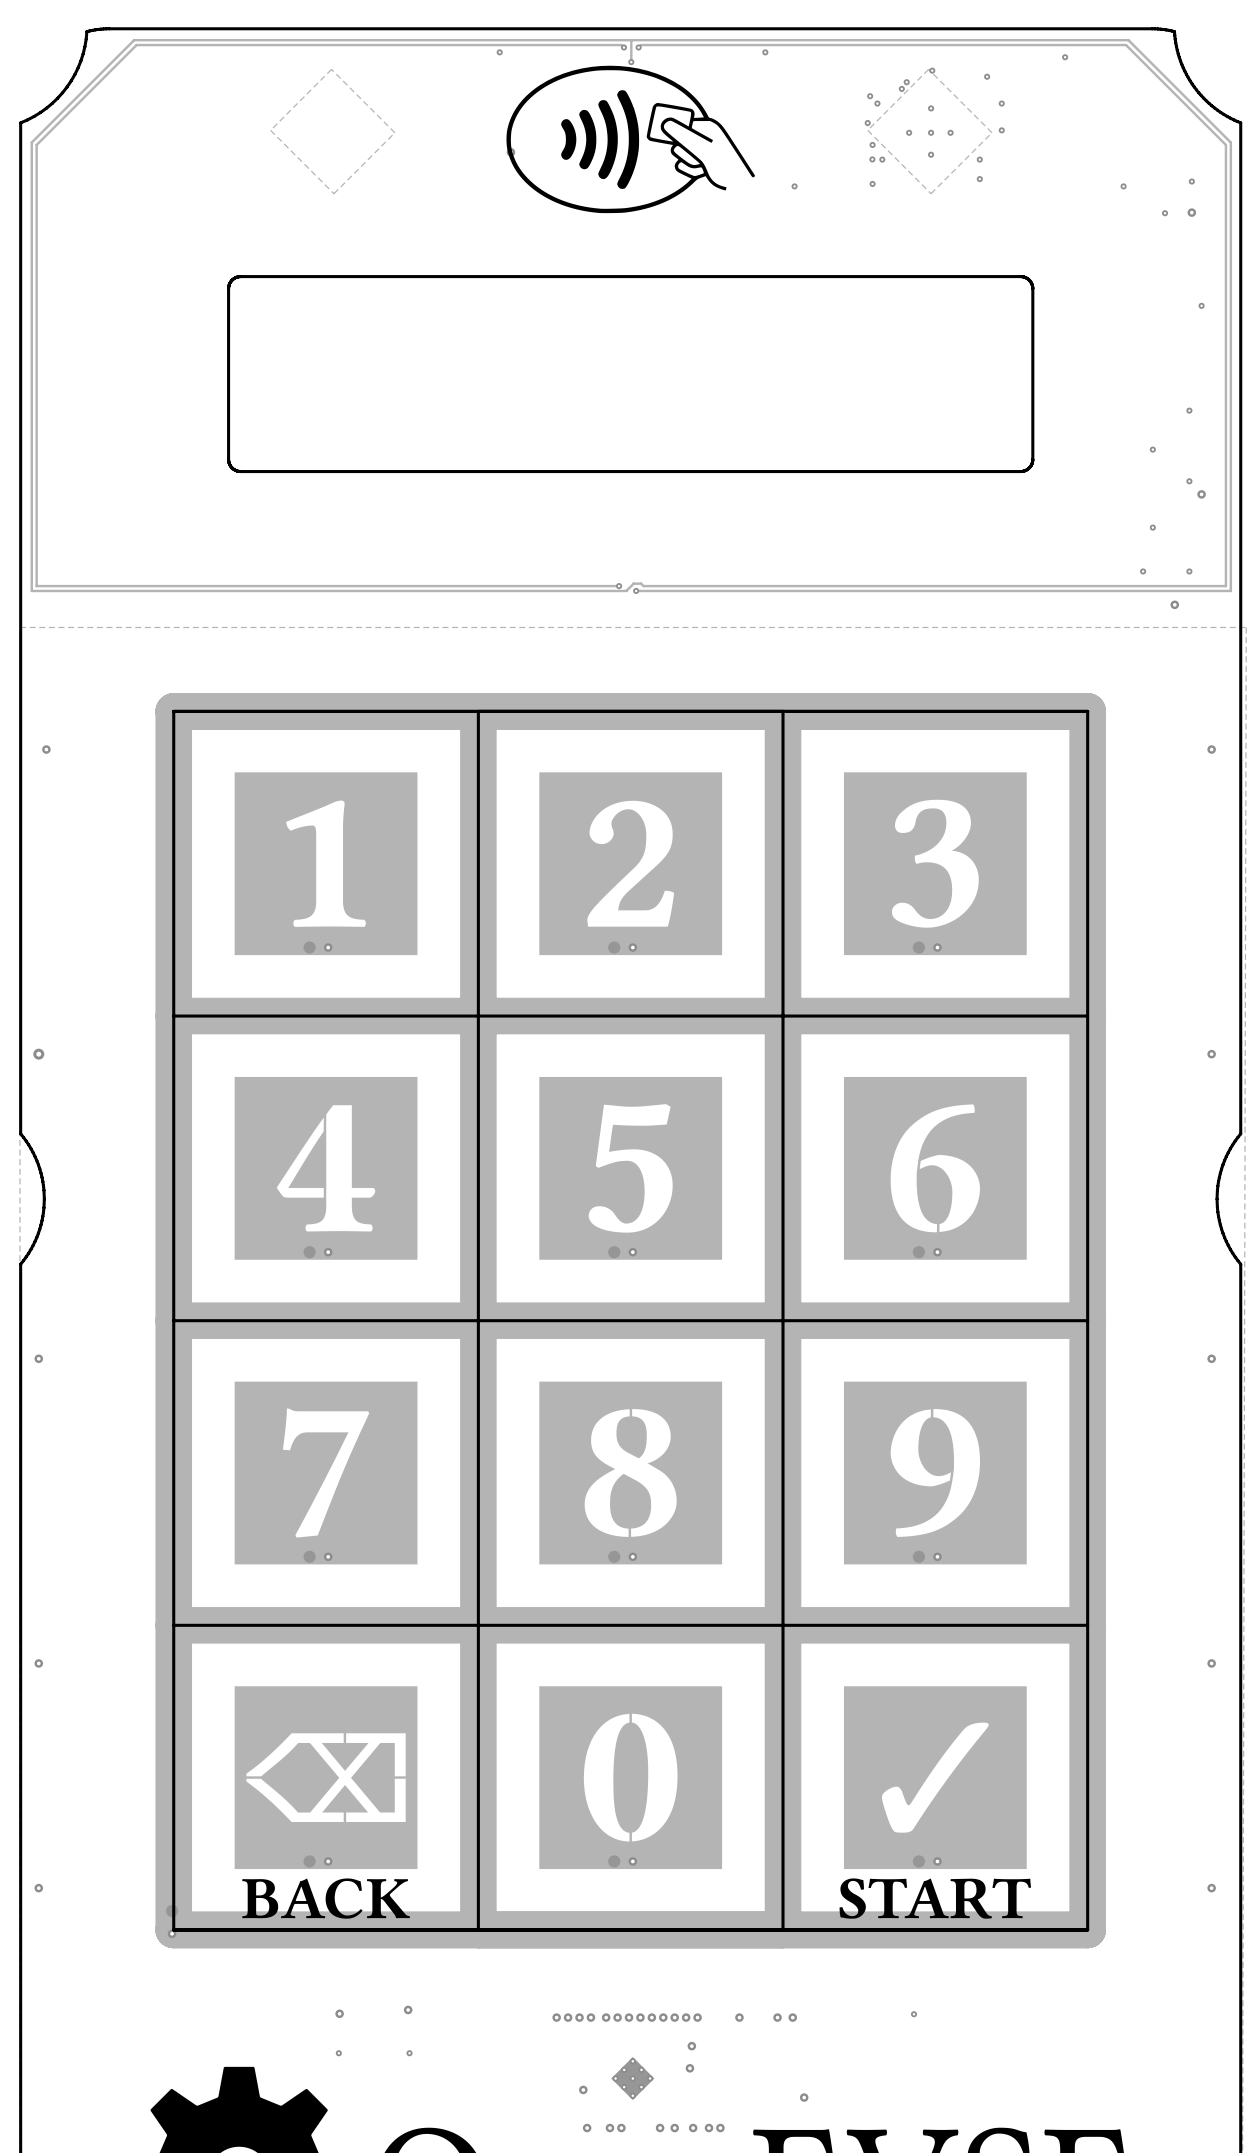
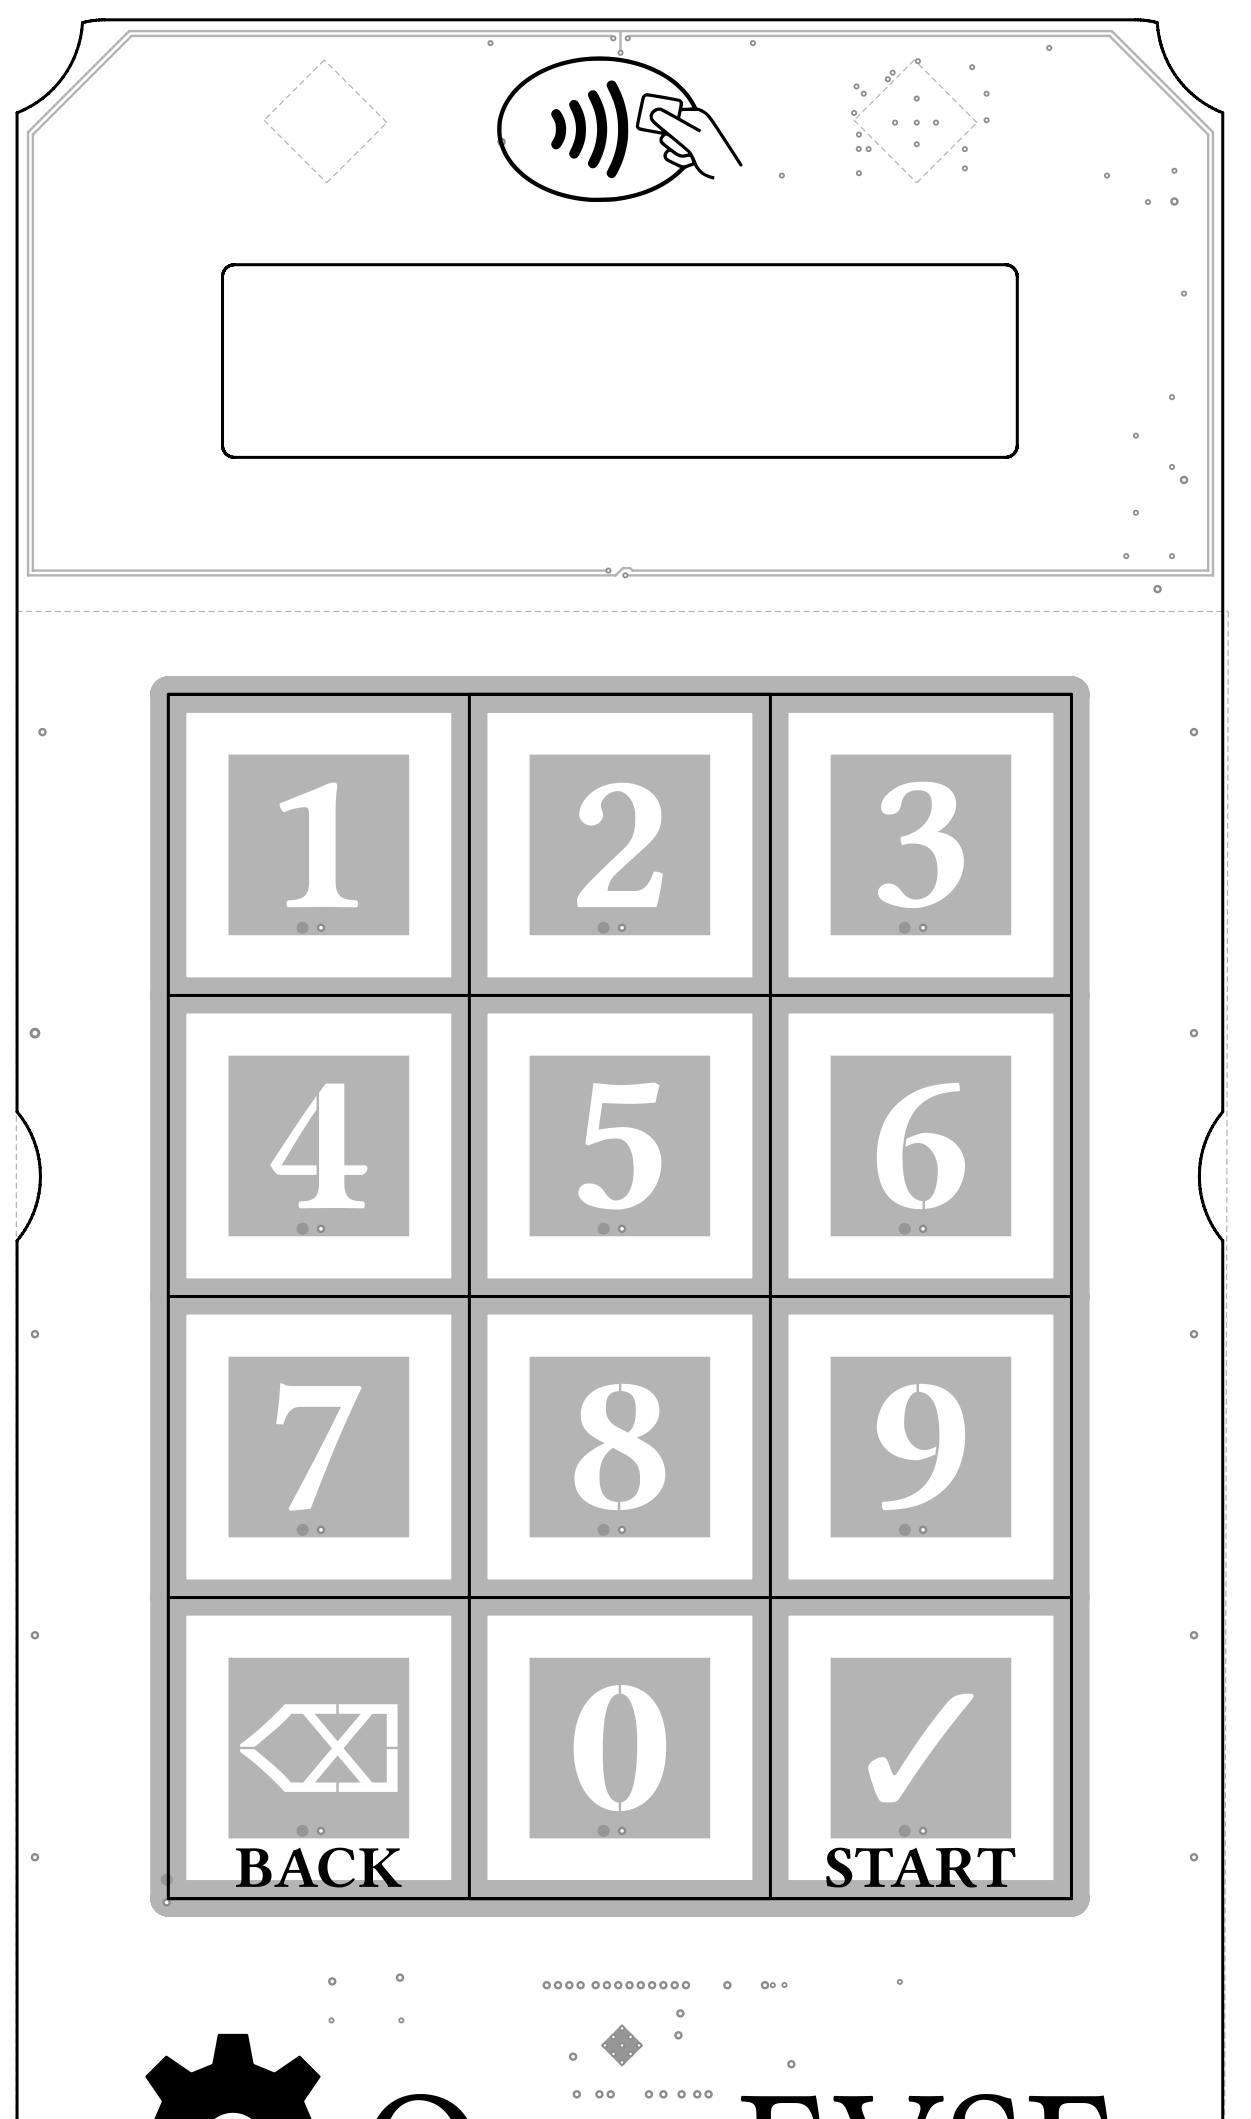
via: none -> (772, 1985)
via: (792, 2017) -> none
via: none -> (784, 1985)

